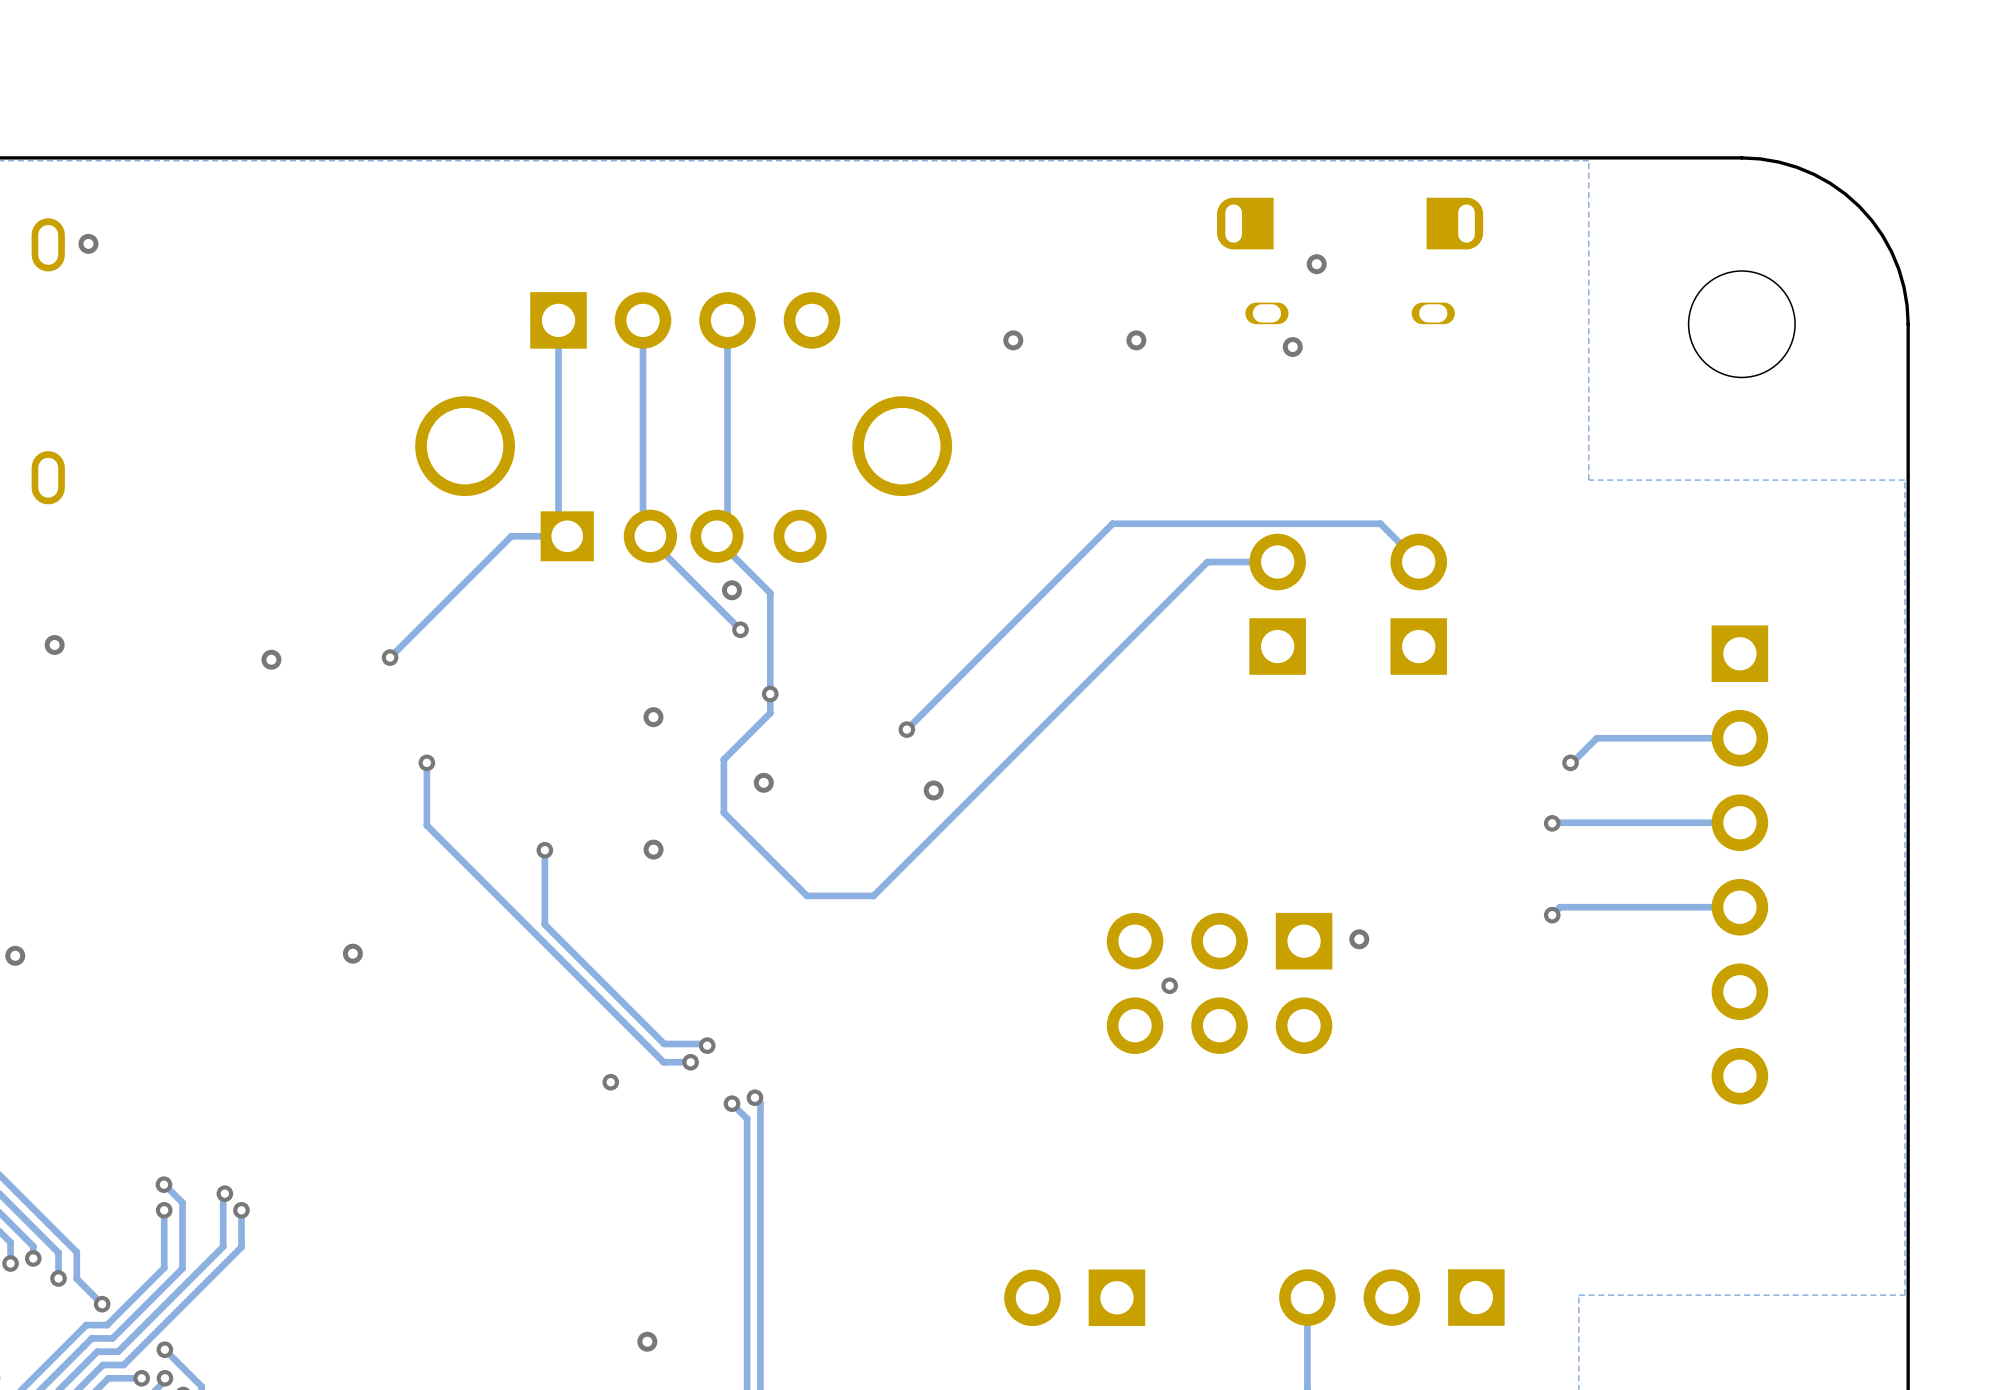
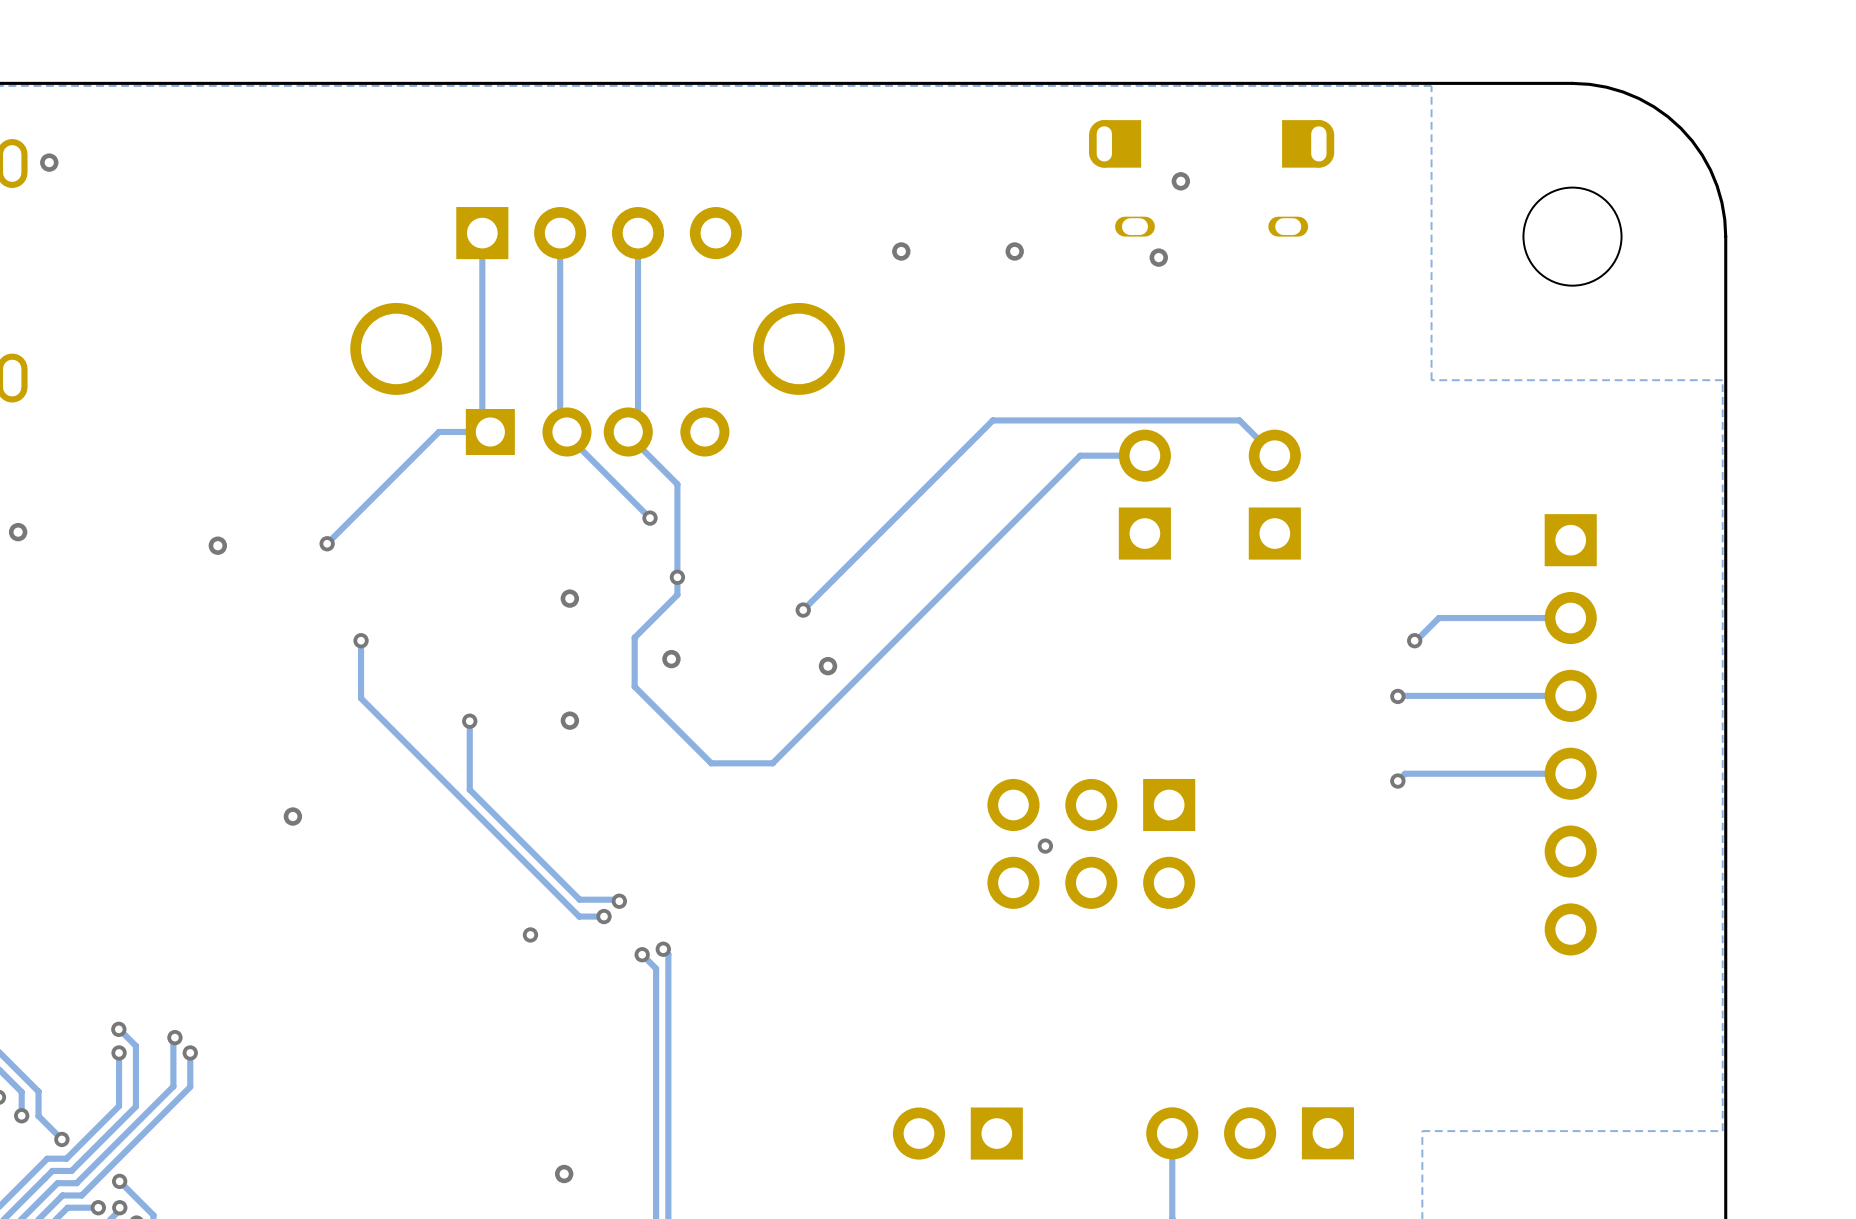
via: (731, 590) -> none
via: (1359, 939) -> none

